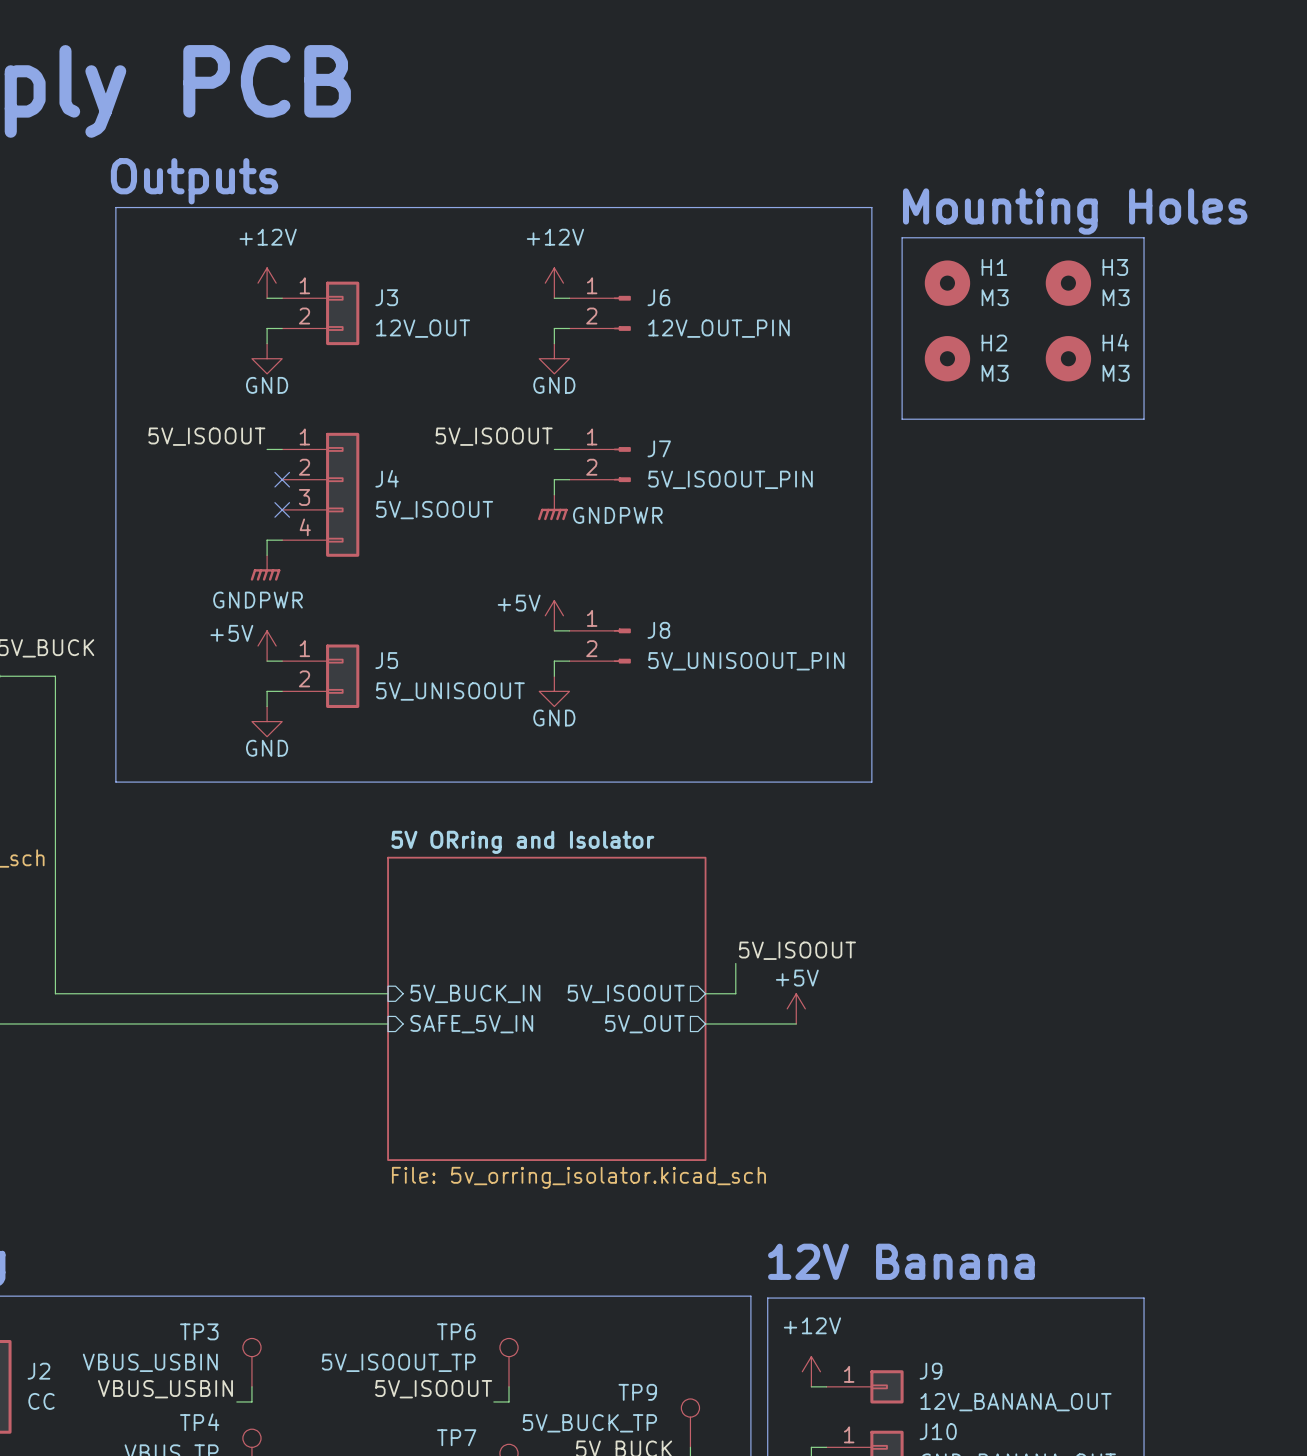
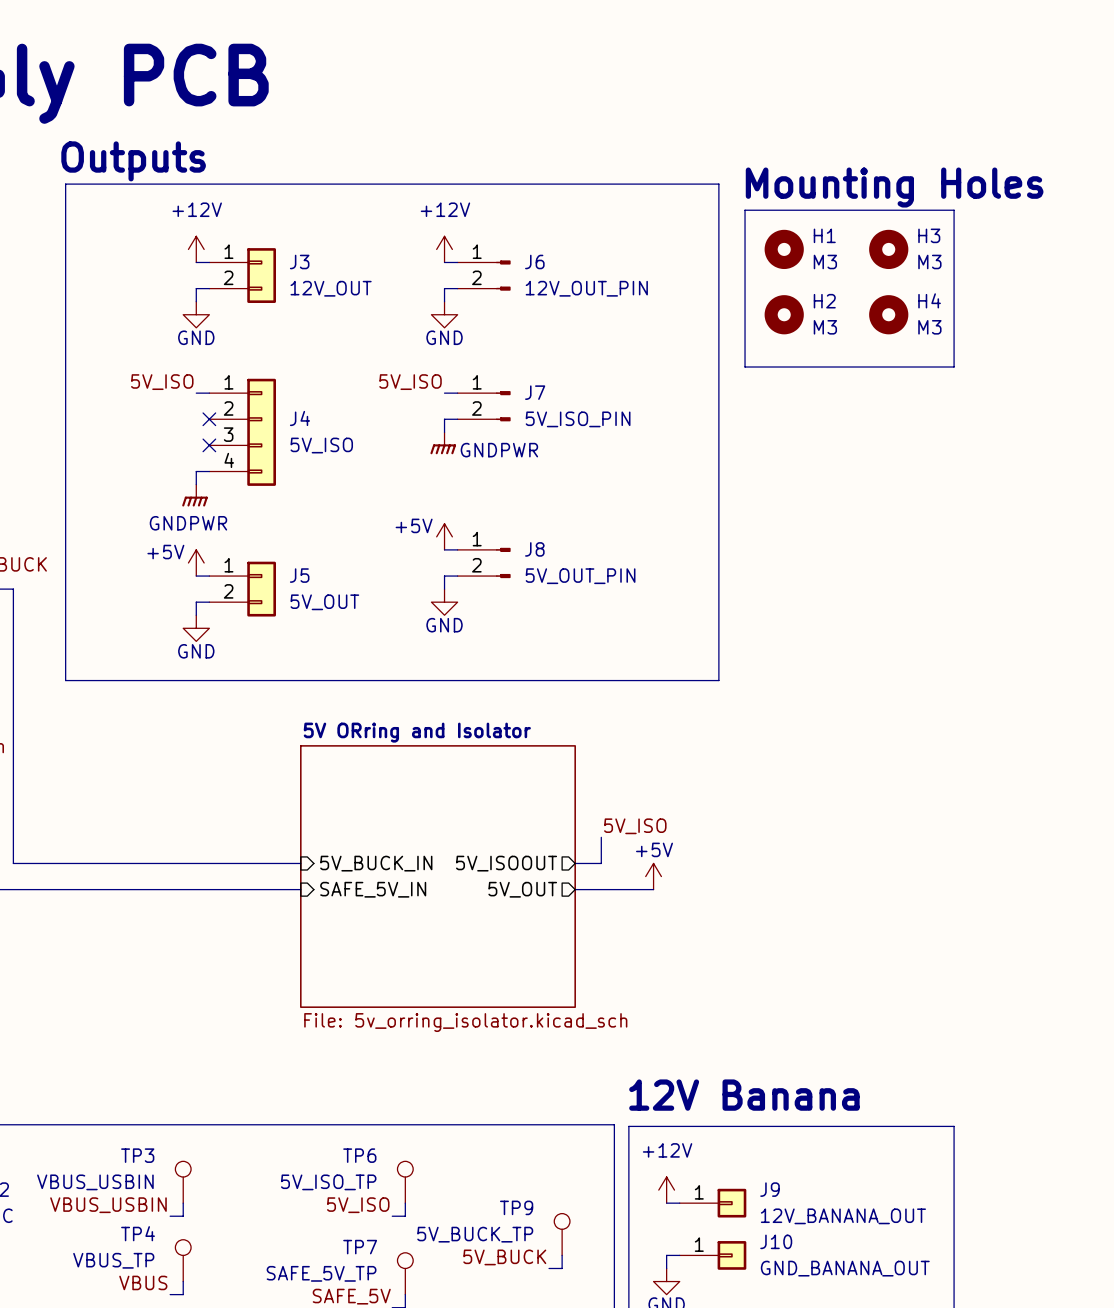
label: 5V_ISOOUT (206, 436) -> 5V_ISO (162, 382)
label: 5V_ISOOUT (494, 436) -> 5V_ISO (410, 382)
J7 value: 5V_ISOOUT_PIN (730, 479) -> 5V_ISO_PIN (578, 419)
J4 value: 5V_ISOOUT (434, 510) -> 5V_ISO (321, 445)
J8 value: 5V_UNISOOUT_PIN (746, 661) -> 5V_OUT_PIN (580, 576)
J5 value: 5V_UNISOOUT (450, 691) -> 5V_OUT (324, 602)
label: 5V_ISOOUT (797, 950) -> 5V_ISO (635, 826)
TP6 value: 5V_ISOOUT_TP (398, 1362) -> 5V_ISO_TP (328, 1182)
label: 5V_ISOOUT (433, 1389) -> 5V_ISO (358, 1205)

